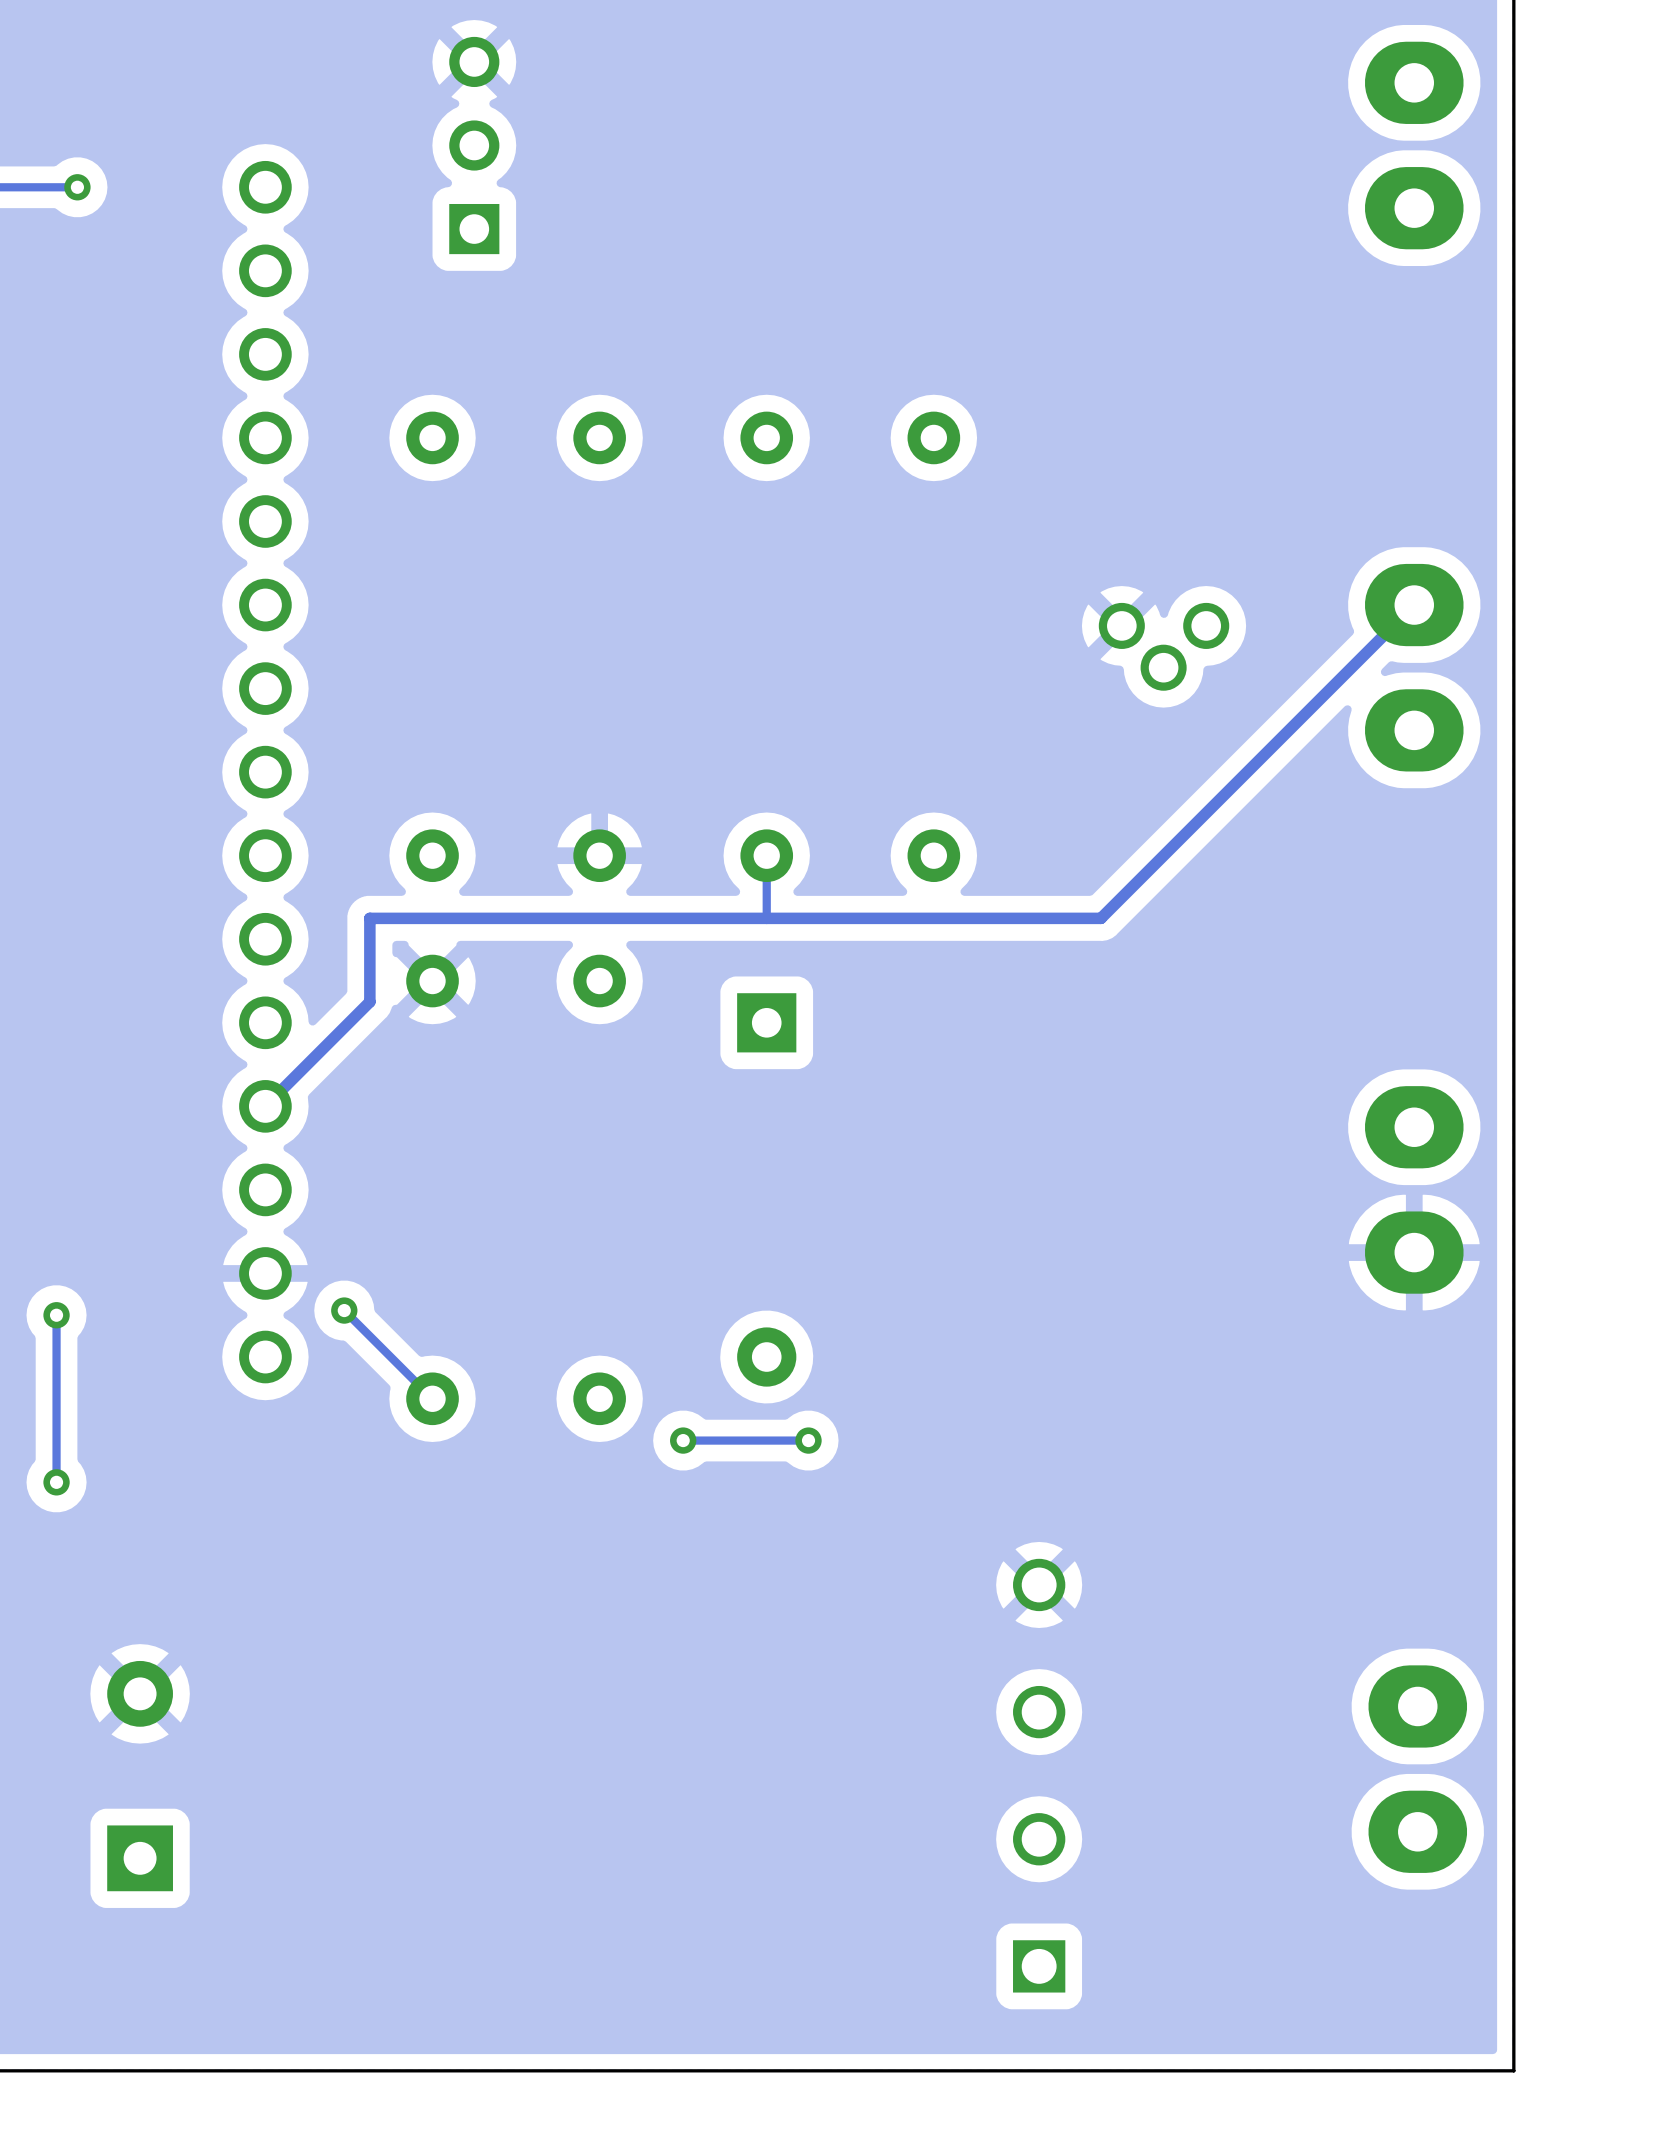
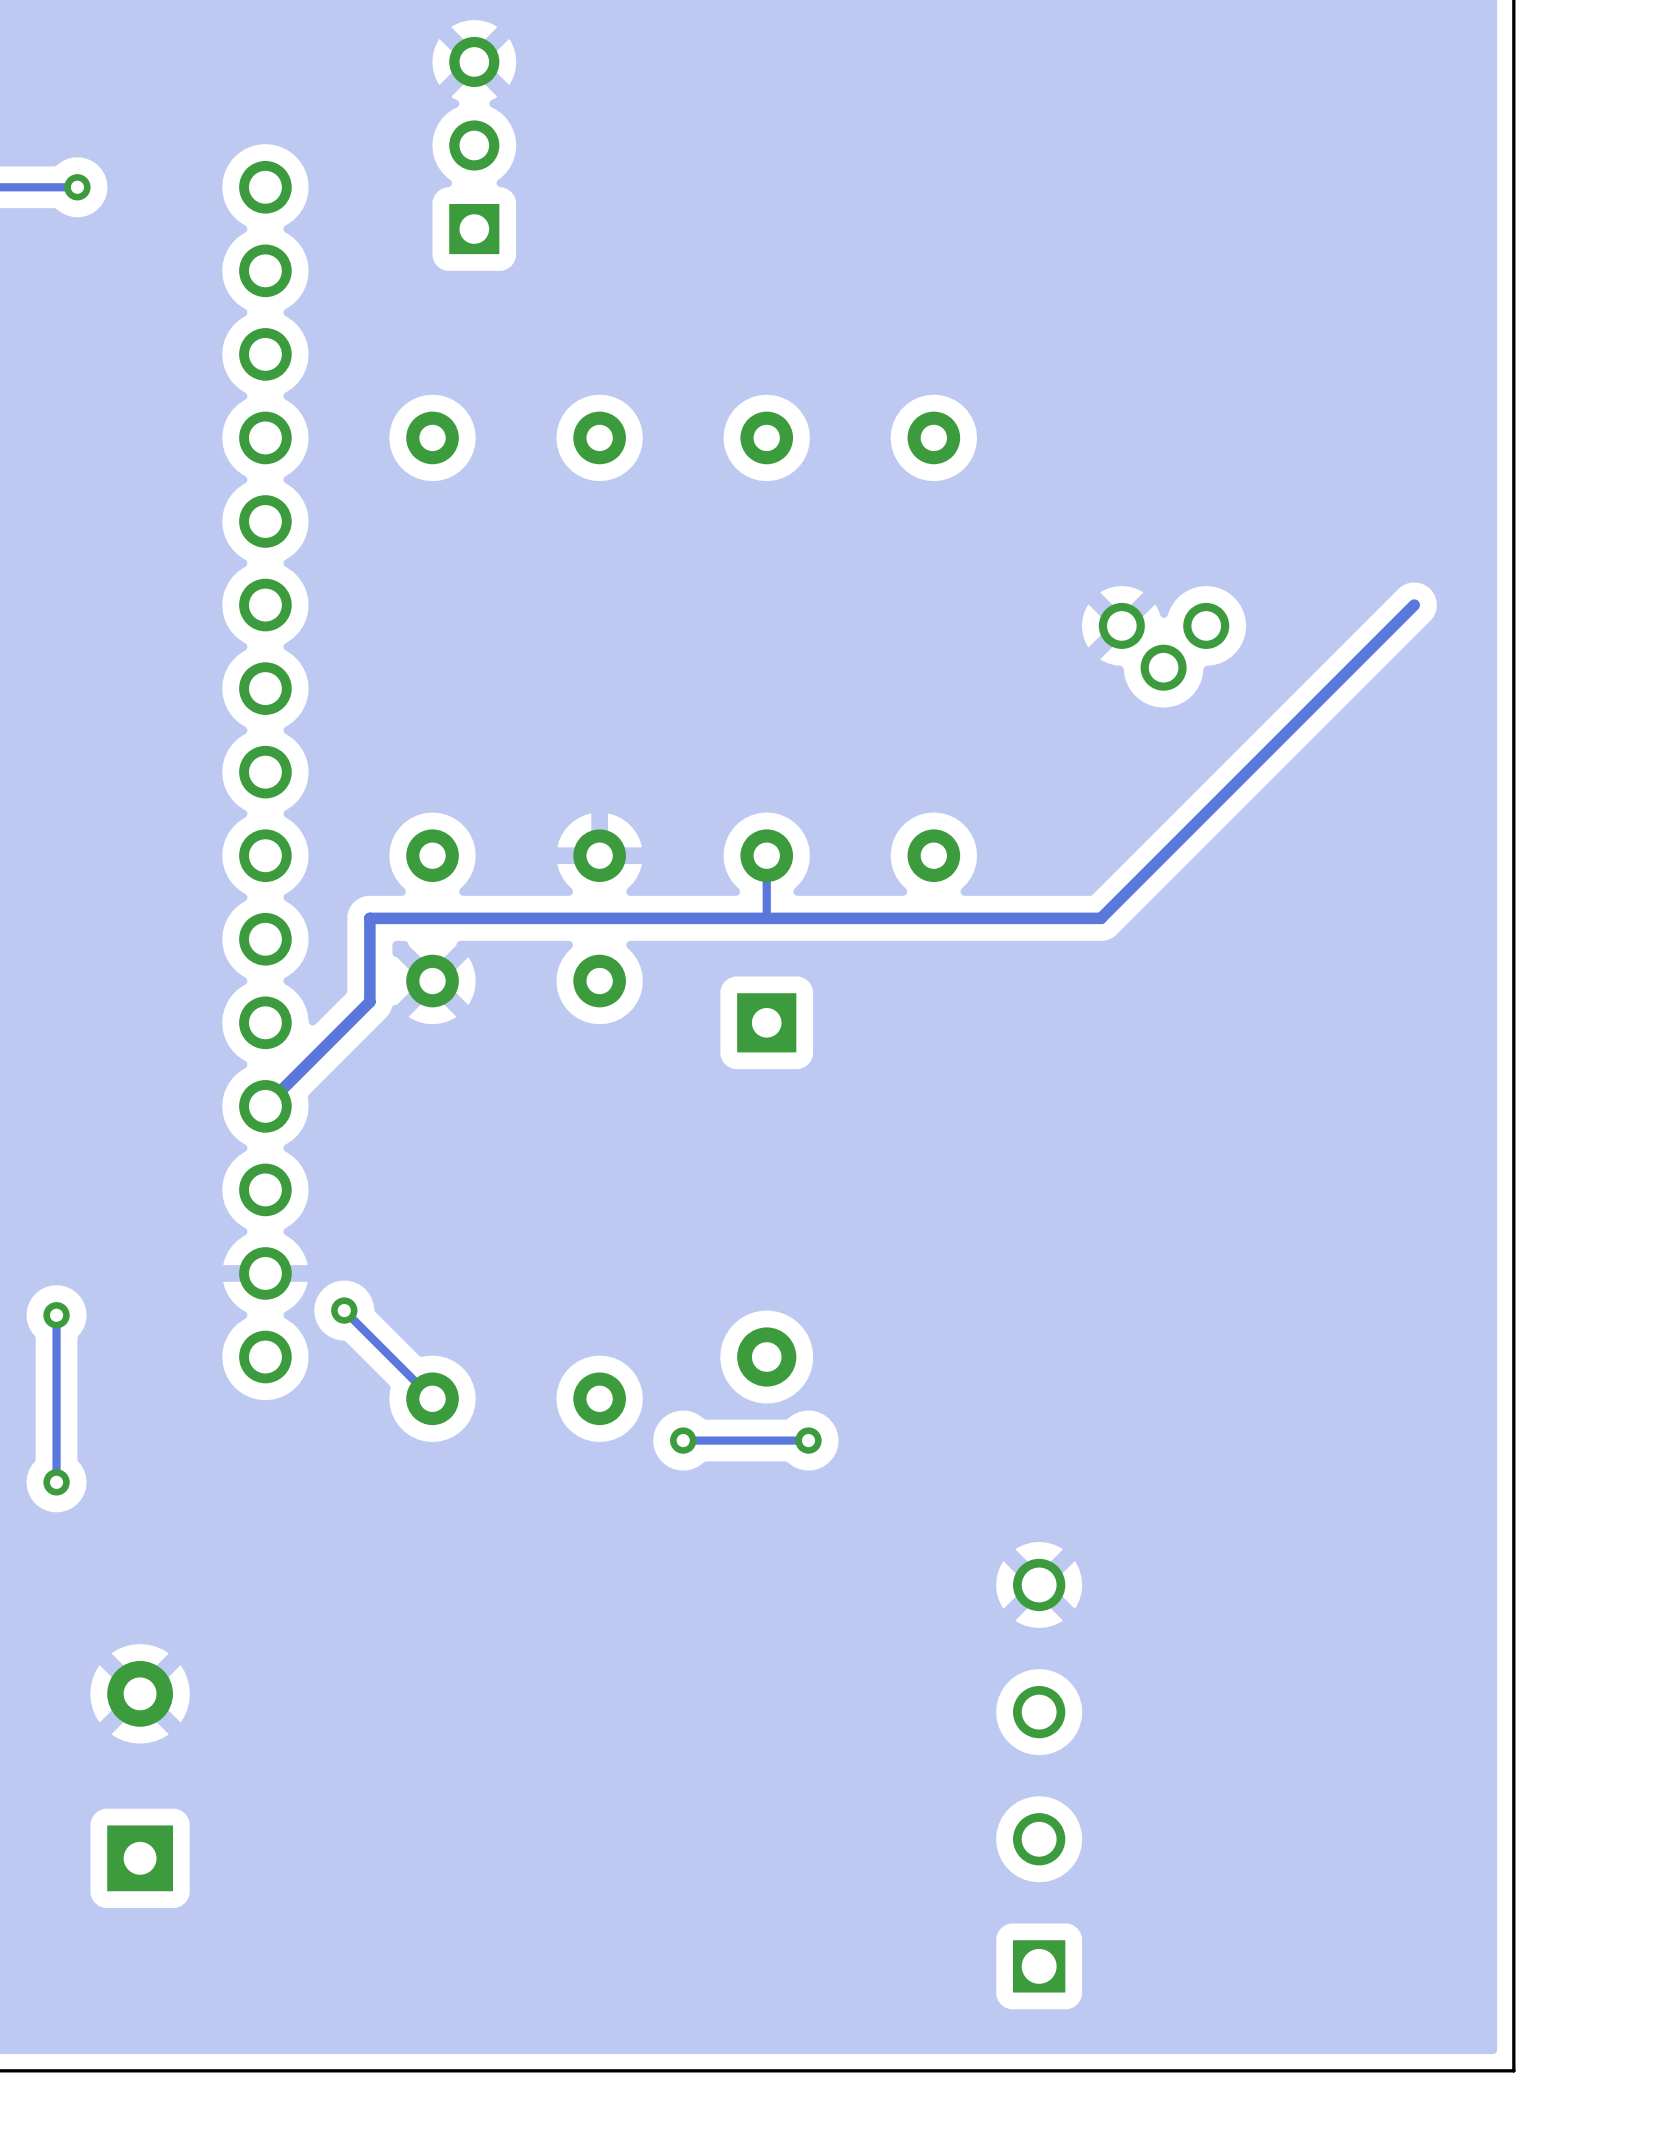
part: (1414, 145) -> none
part: (1414, 667) -> none
part: (1414, 1189) -> none
part: (1417, 1769) -> none

